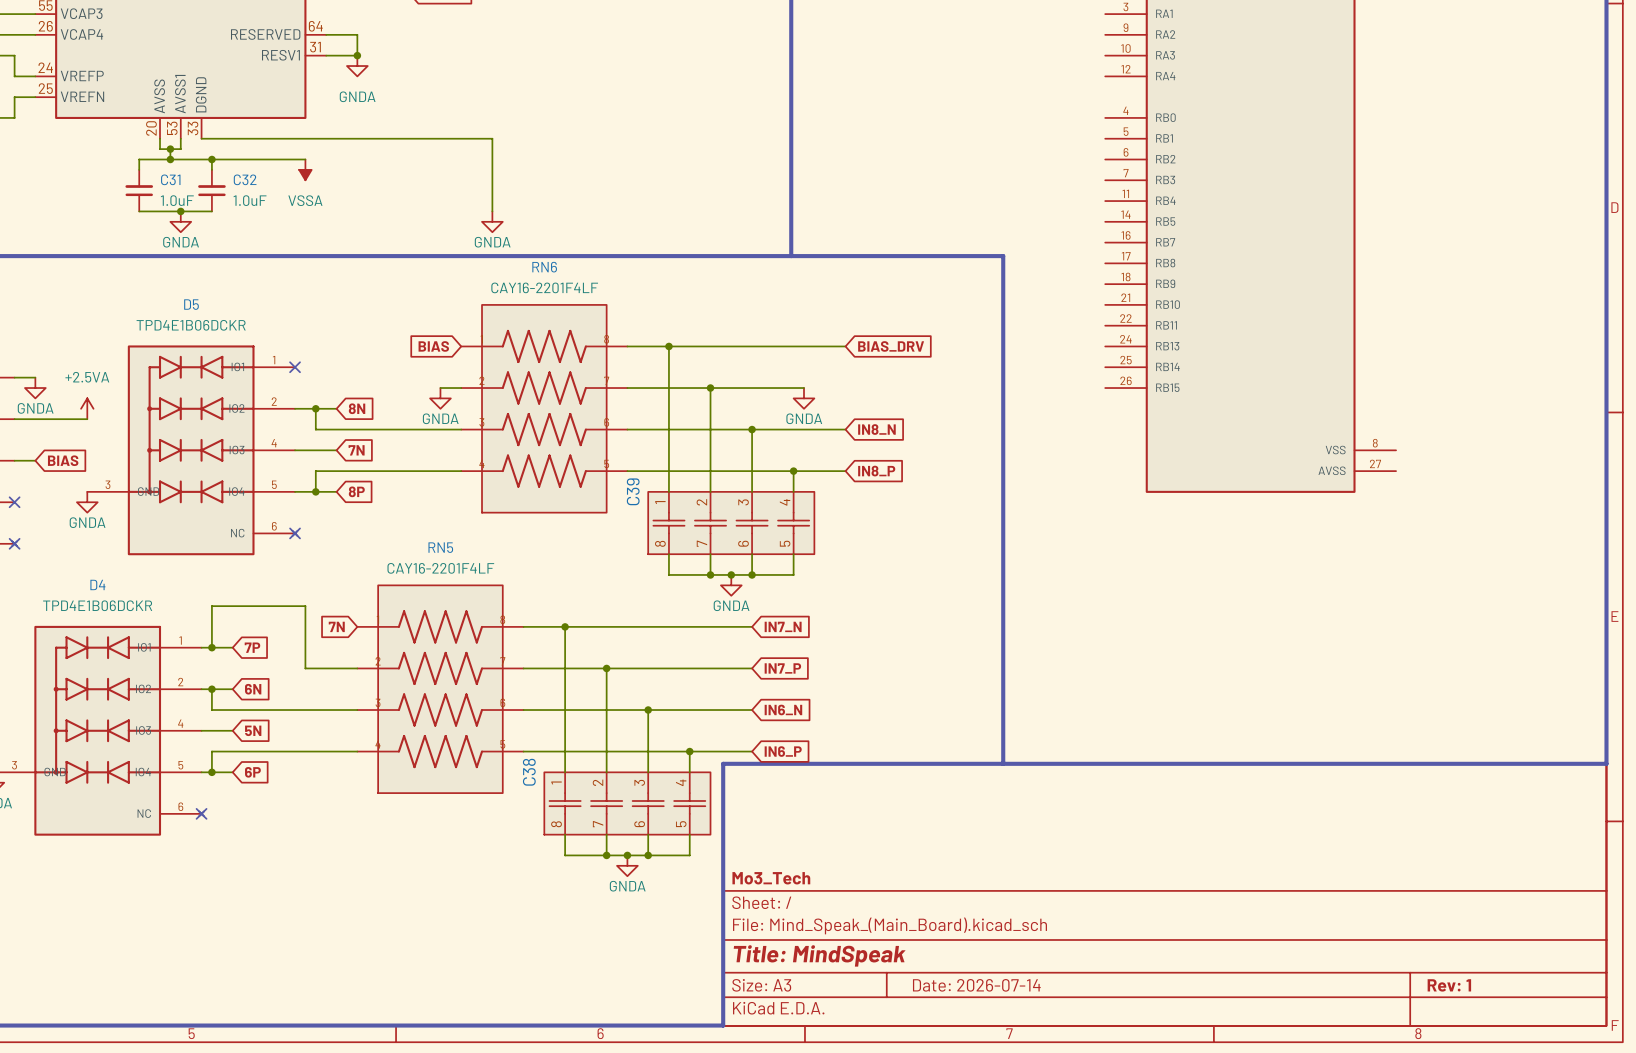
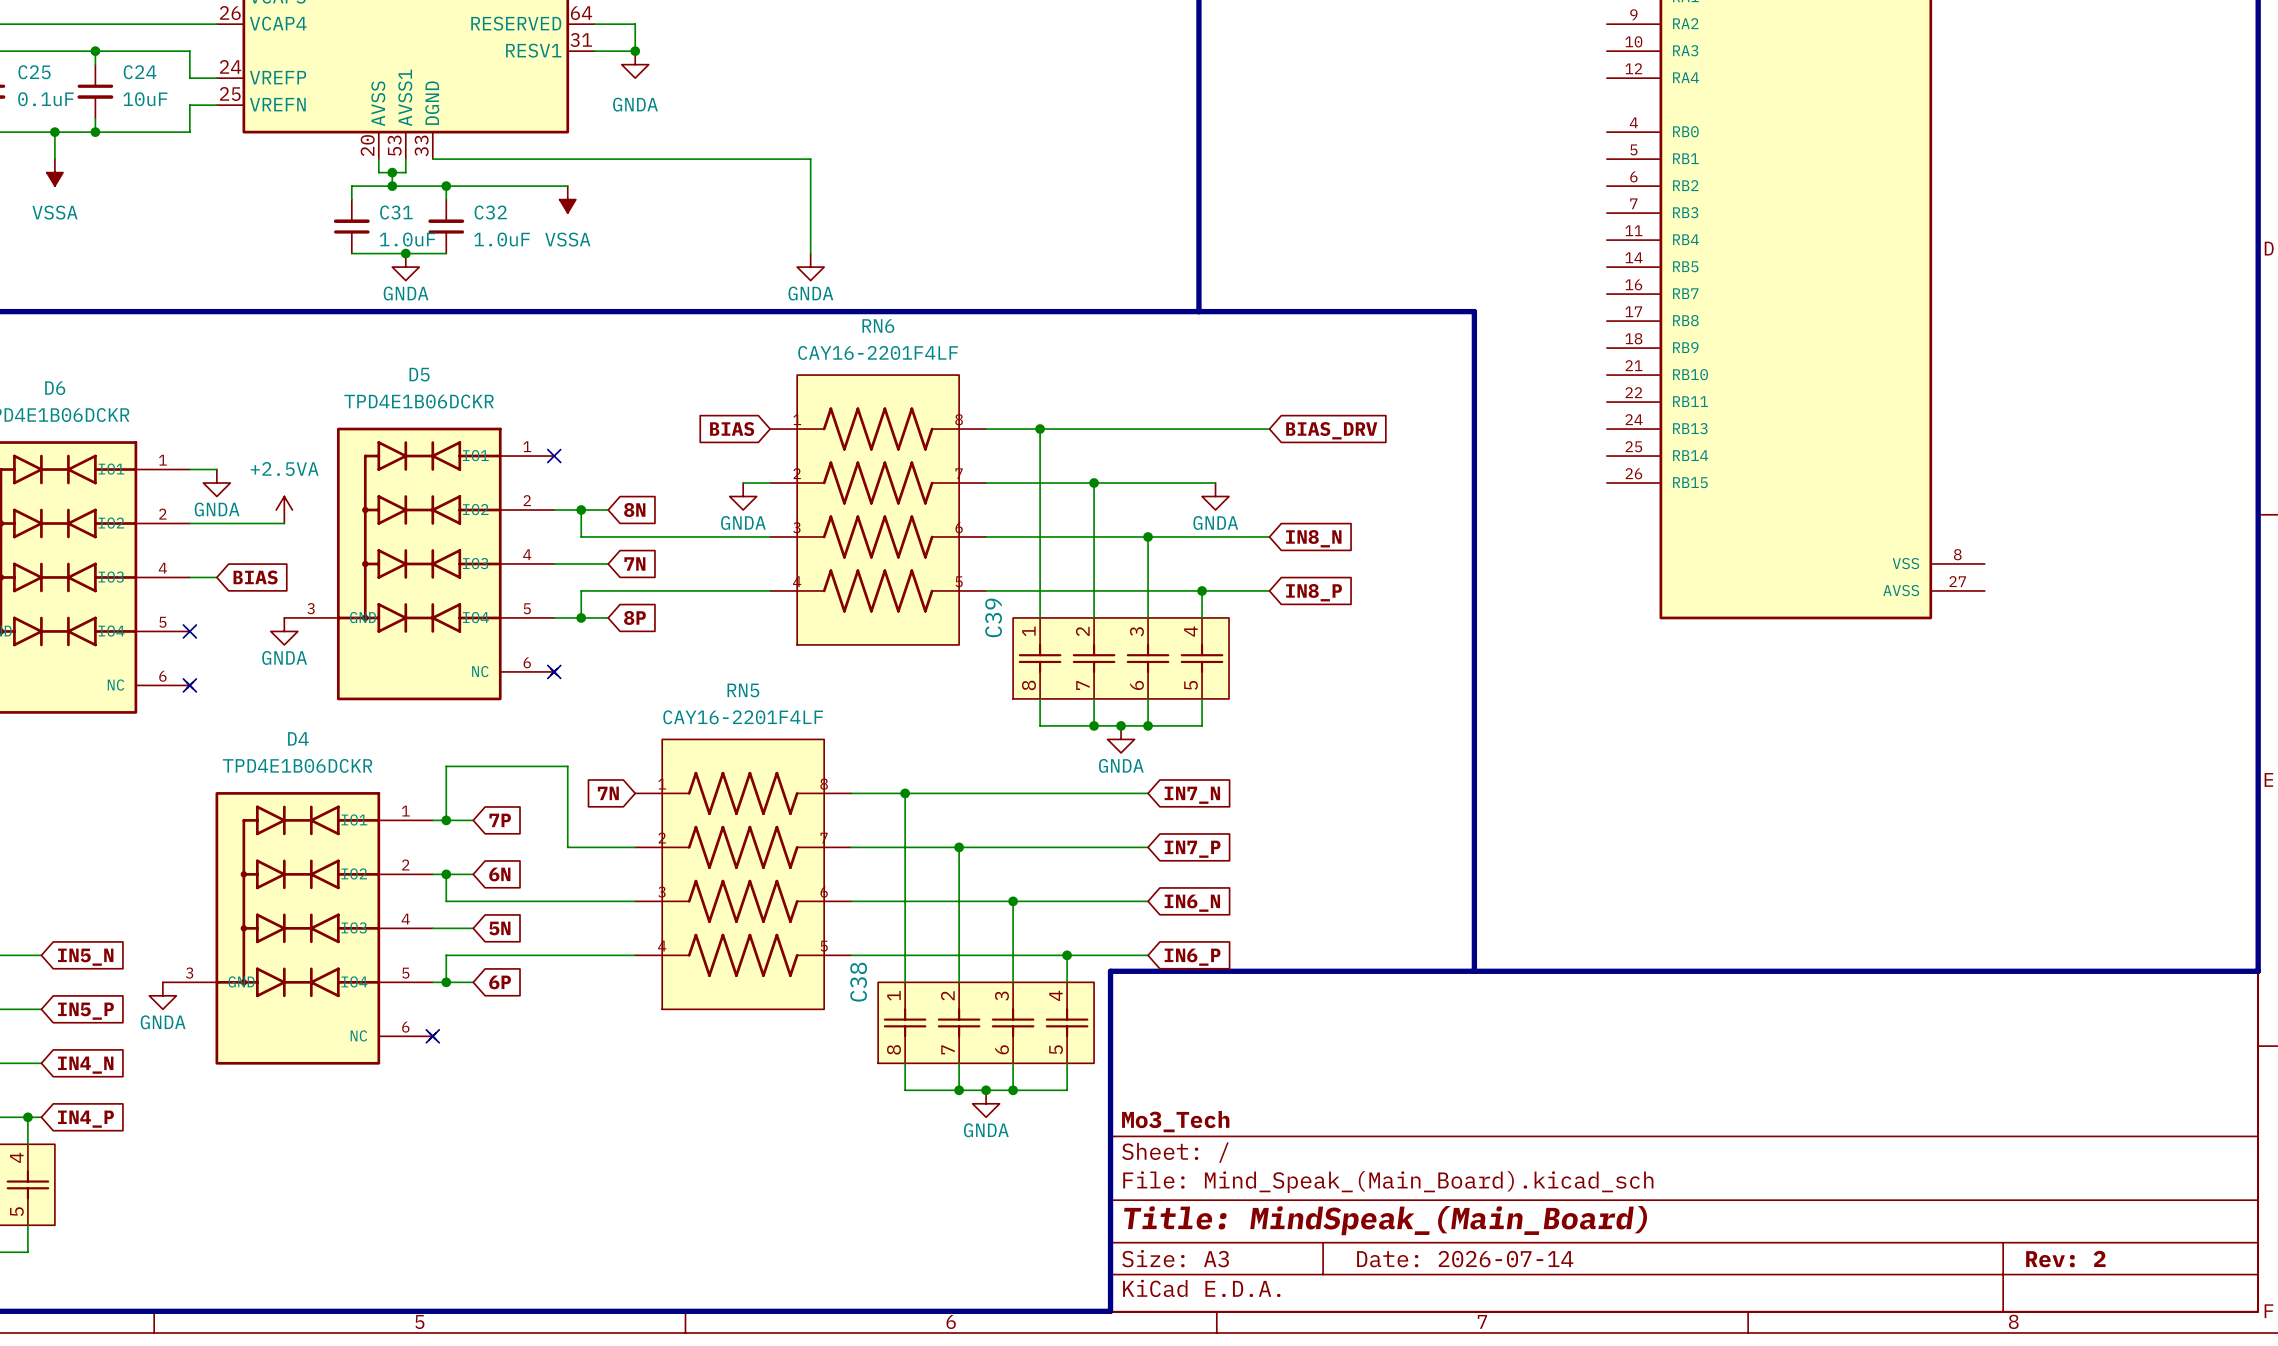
title block: Title: MindSpeak (819, 955) -> Title: MindSpeak_(Main_Board) (1385, 1220)
title block: Rev: 1 (1449, 985) -> Rev: 2 (2065, 1259)

